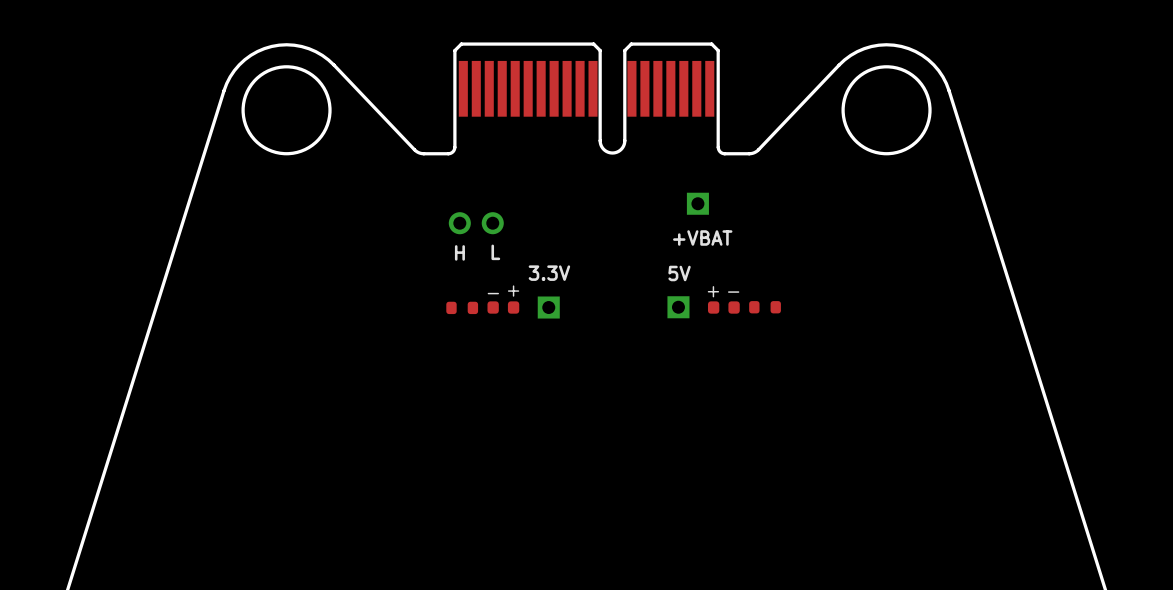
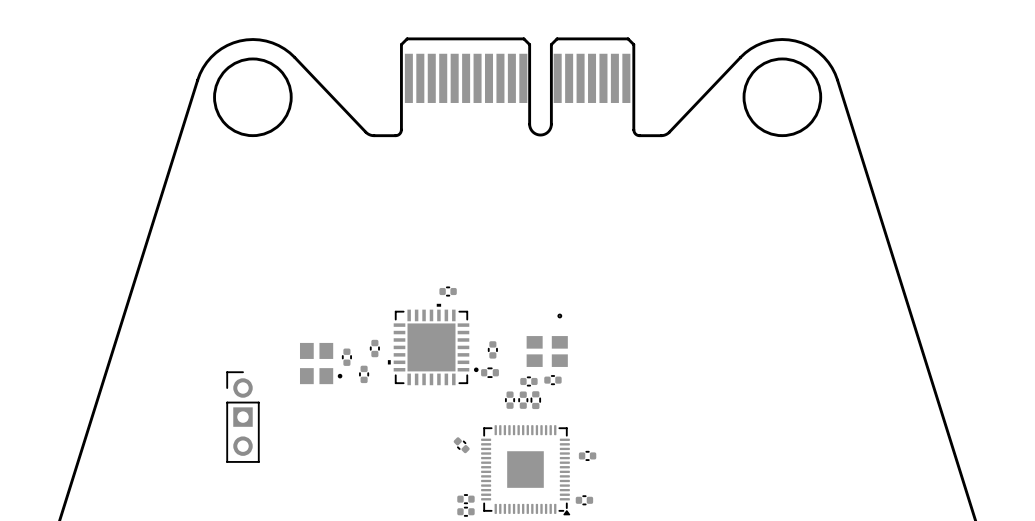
part: (697, 203) -> none
part: (476, 223) -> none
text: +VBAT (702, 238) -> none
text: H (459, 252) -> none
text: L (495, 252) -> none
text: 3.3V (549, 273) -> none
text: 5V (679, 273) -> none
part: (462, 307) -> none
part: (503, 307) -> none
part: (548, 307) -> none
part: (678, 307) -> none
part: (723, 307) -> none
part: (765, 307) -> none
part: none -> (448, 291)
part: none -> (547, 340)
part: none -> (428, 344)
part: none -> (374, 348)
part: none -> (492, 349)
part: none -> (346, 357)
part: none -> (321, 363)
drawing: none -> [473, 367, 479, 373]
part: none -> (490, 372)
part: none -> (364, 374)
part: none -> (552, 380)
part: none -> (528, 381)
part: none -> (510, 400)
part: none -> (523, 400)
part: none -> (535, 400)
part: none -> (242, 417)
part: none -> (461, 445)
part: none -> (587, 455)
part: none -> (525, 470)
part: none -> (465, 499)
part: none -> (584, 500)
part: none -> (465, 511)

